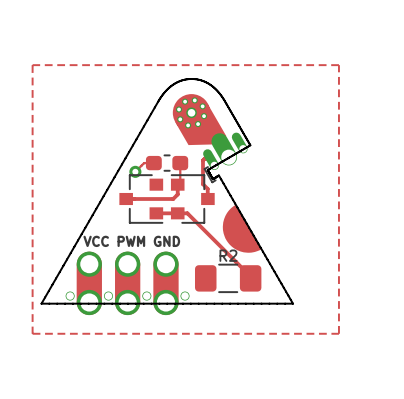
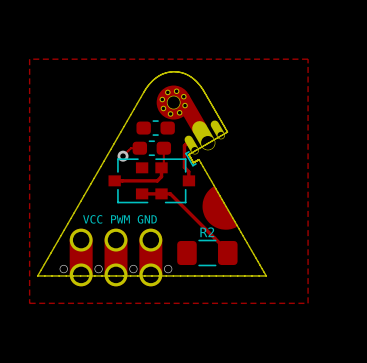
part footprint: [172, 94, 248, 184] -> [156, 85, 226, 167]
part: none -> (155, 128)

